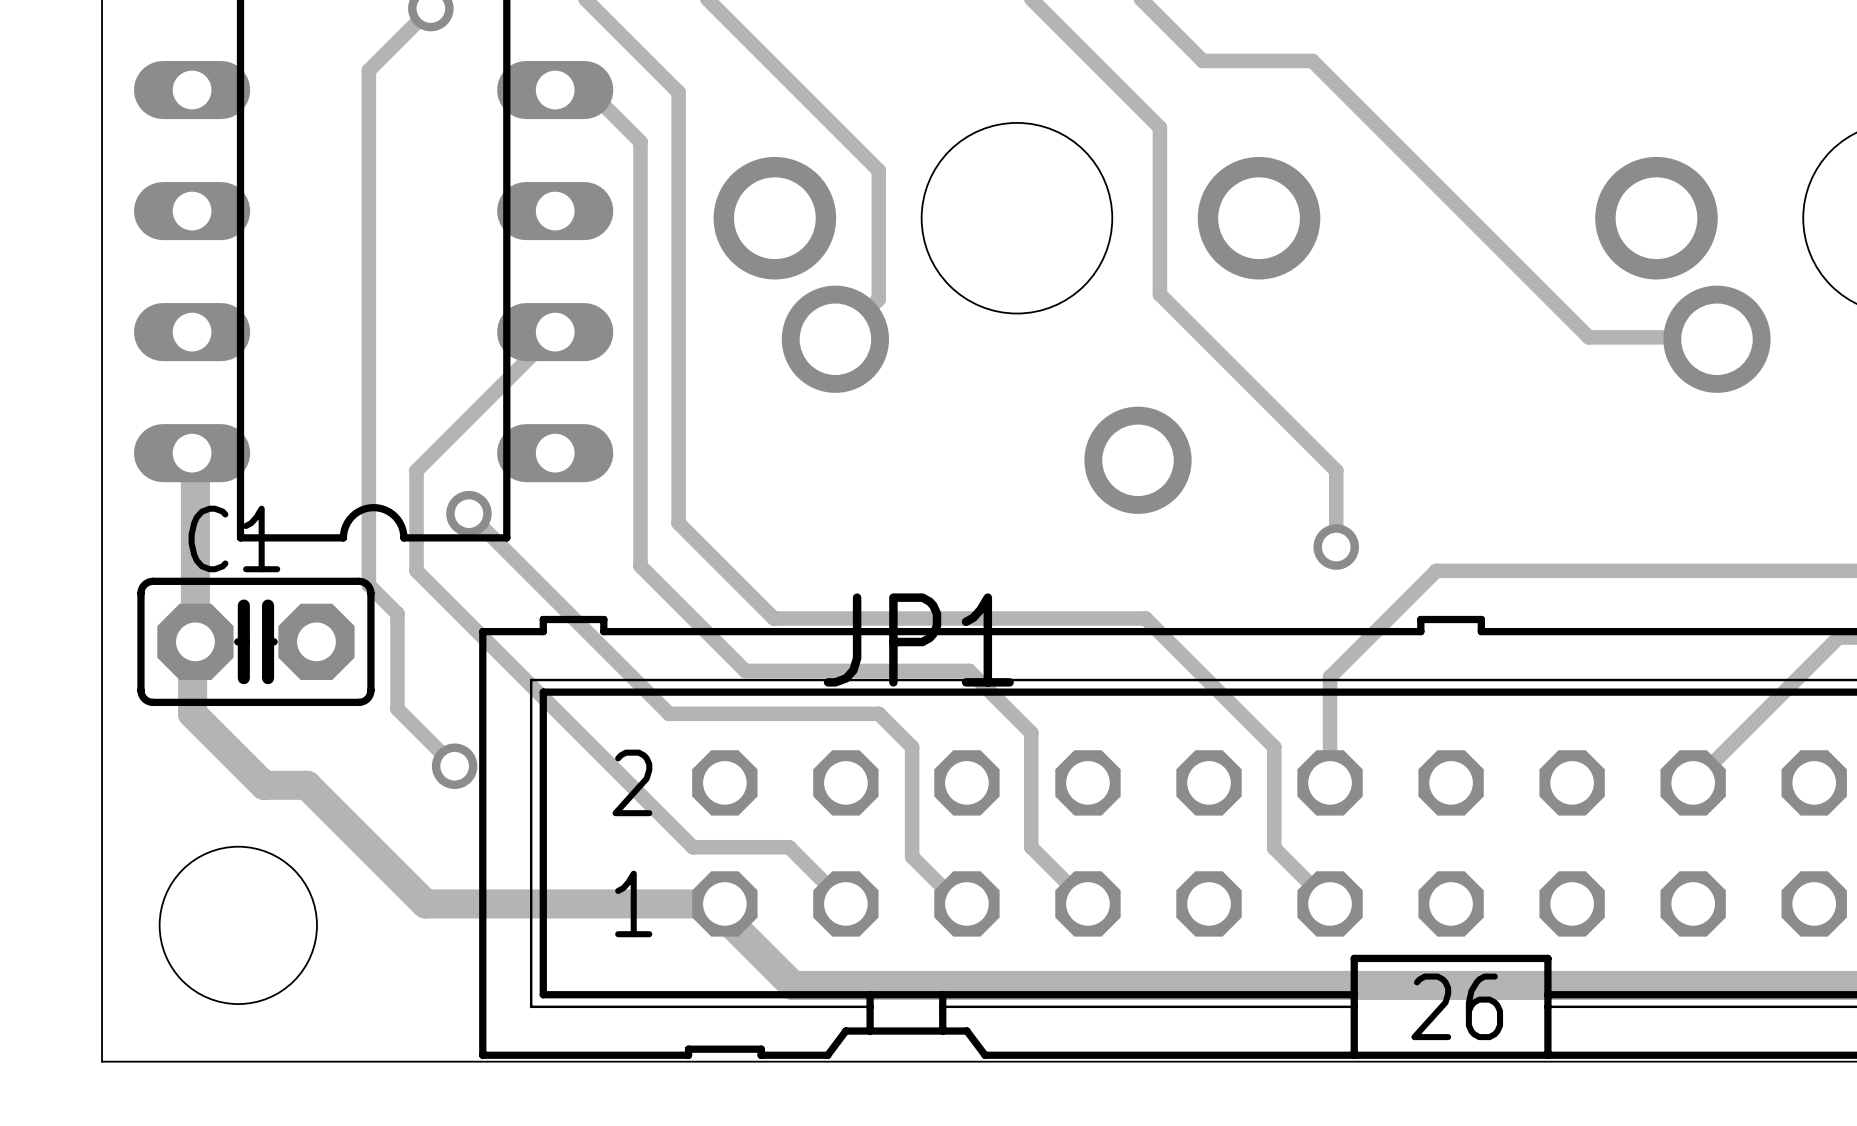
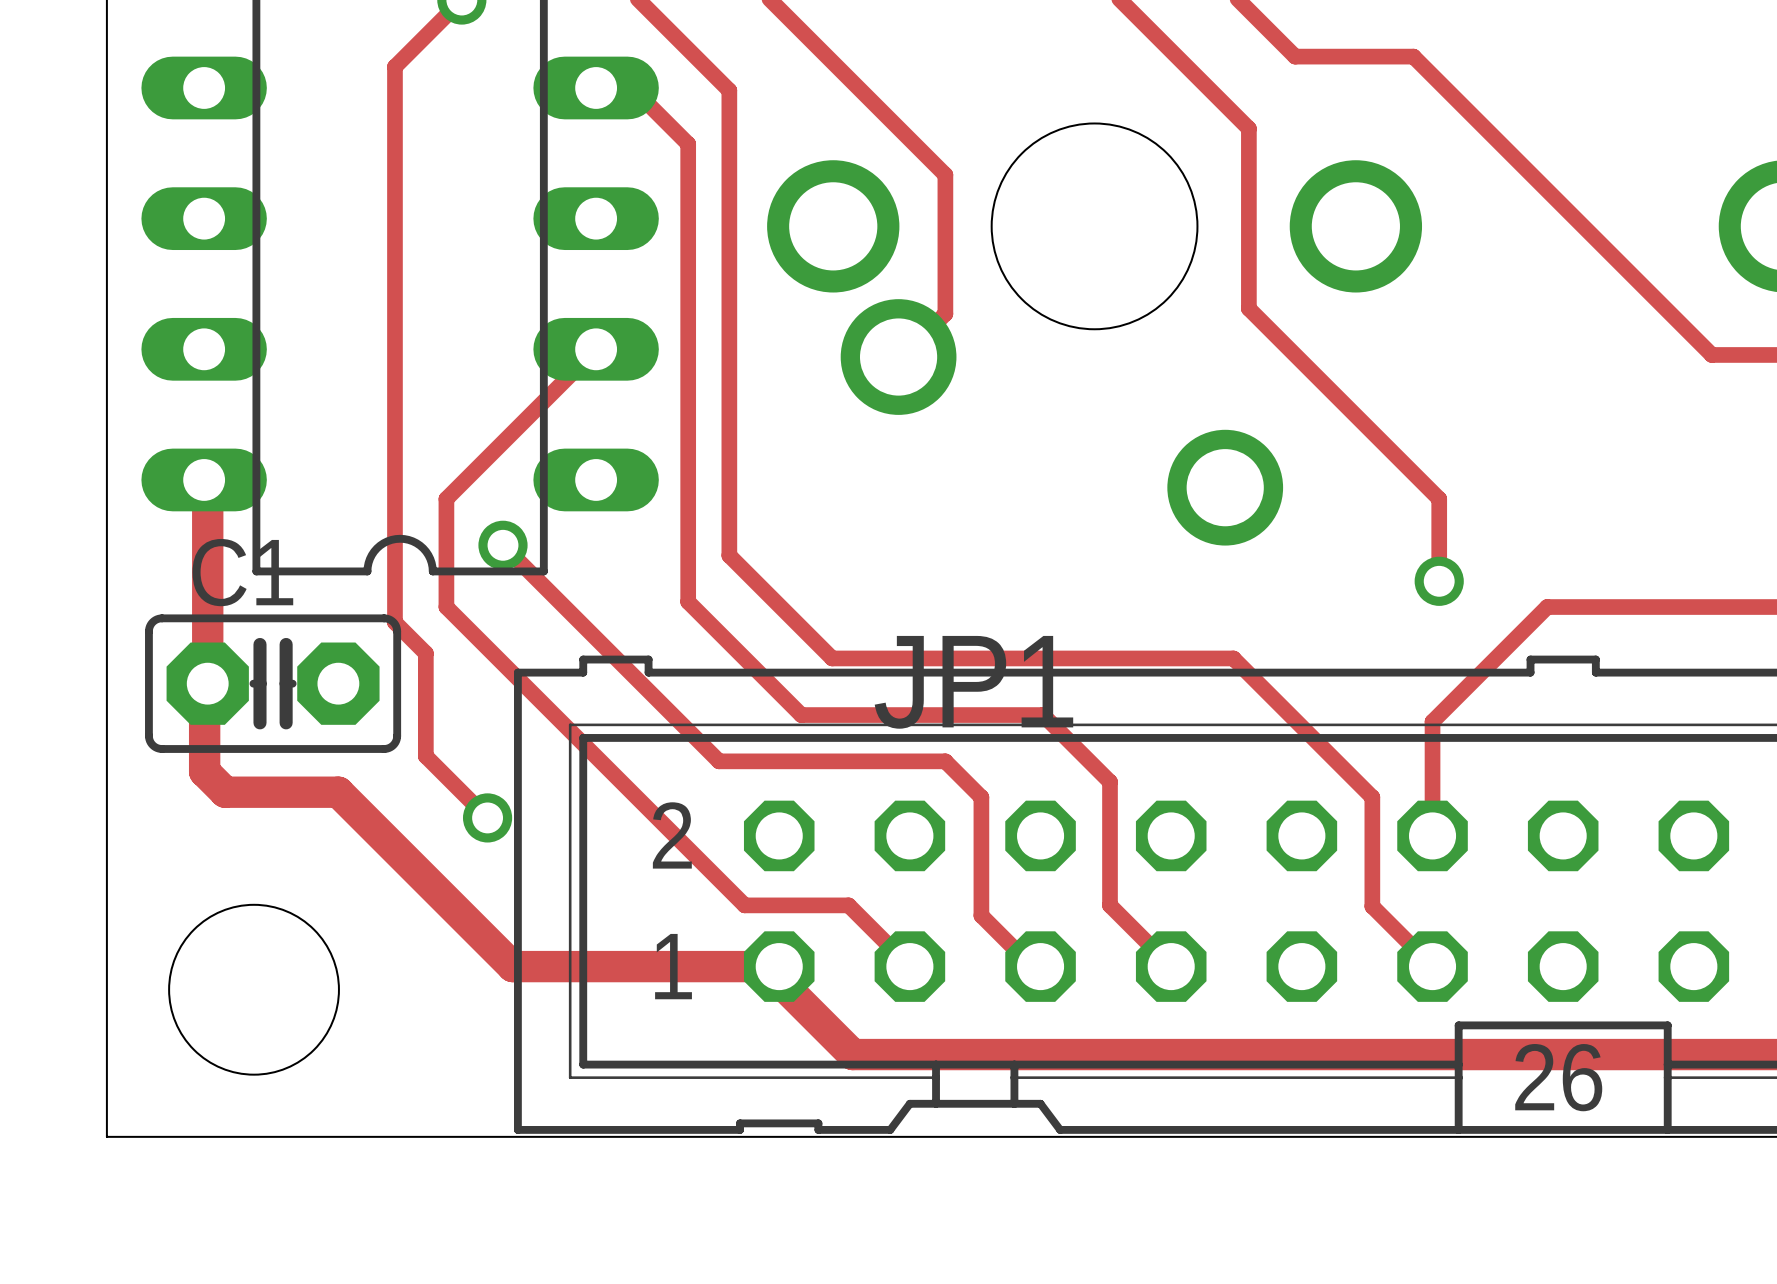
track: (192, 713) (264, 785) (306, 785) (425, 903) (478, 903) -> (204, 761) (204, 771) (225, 792) (338, 792) (512, 966)

